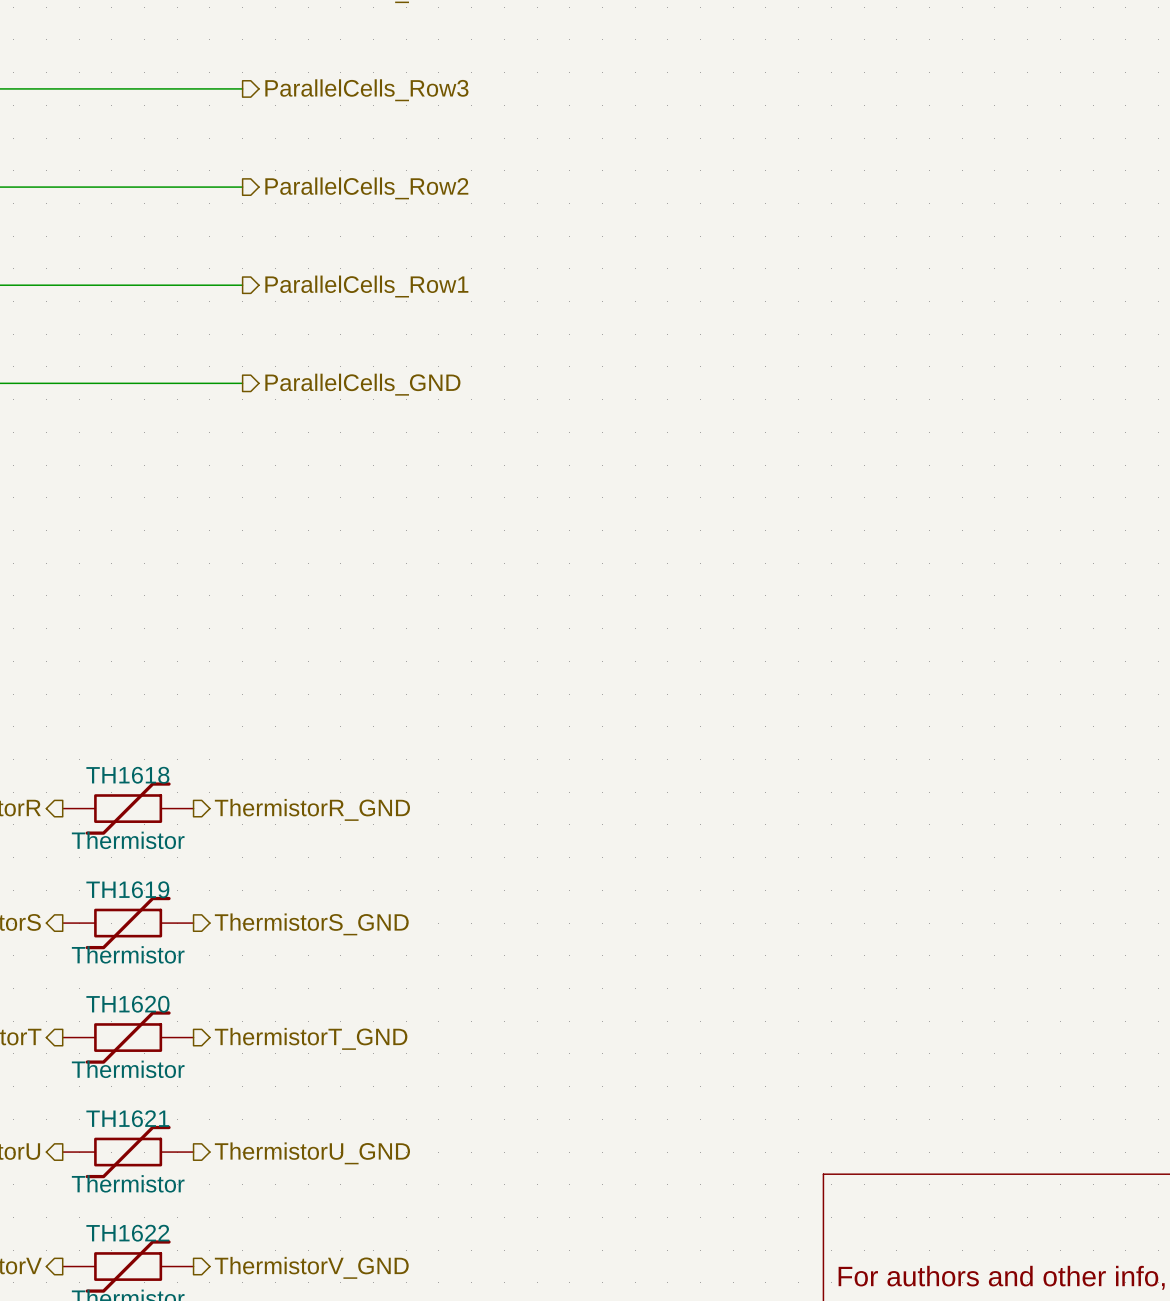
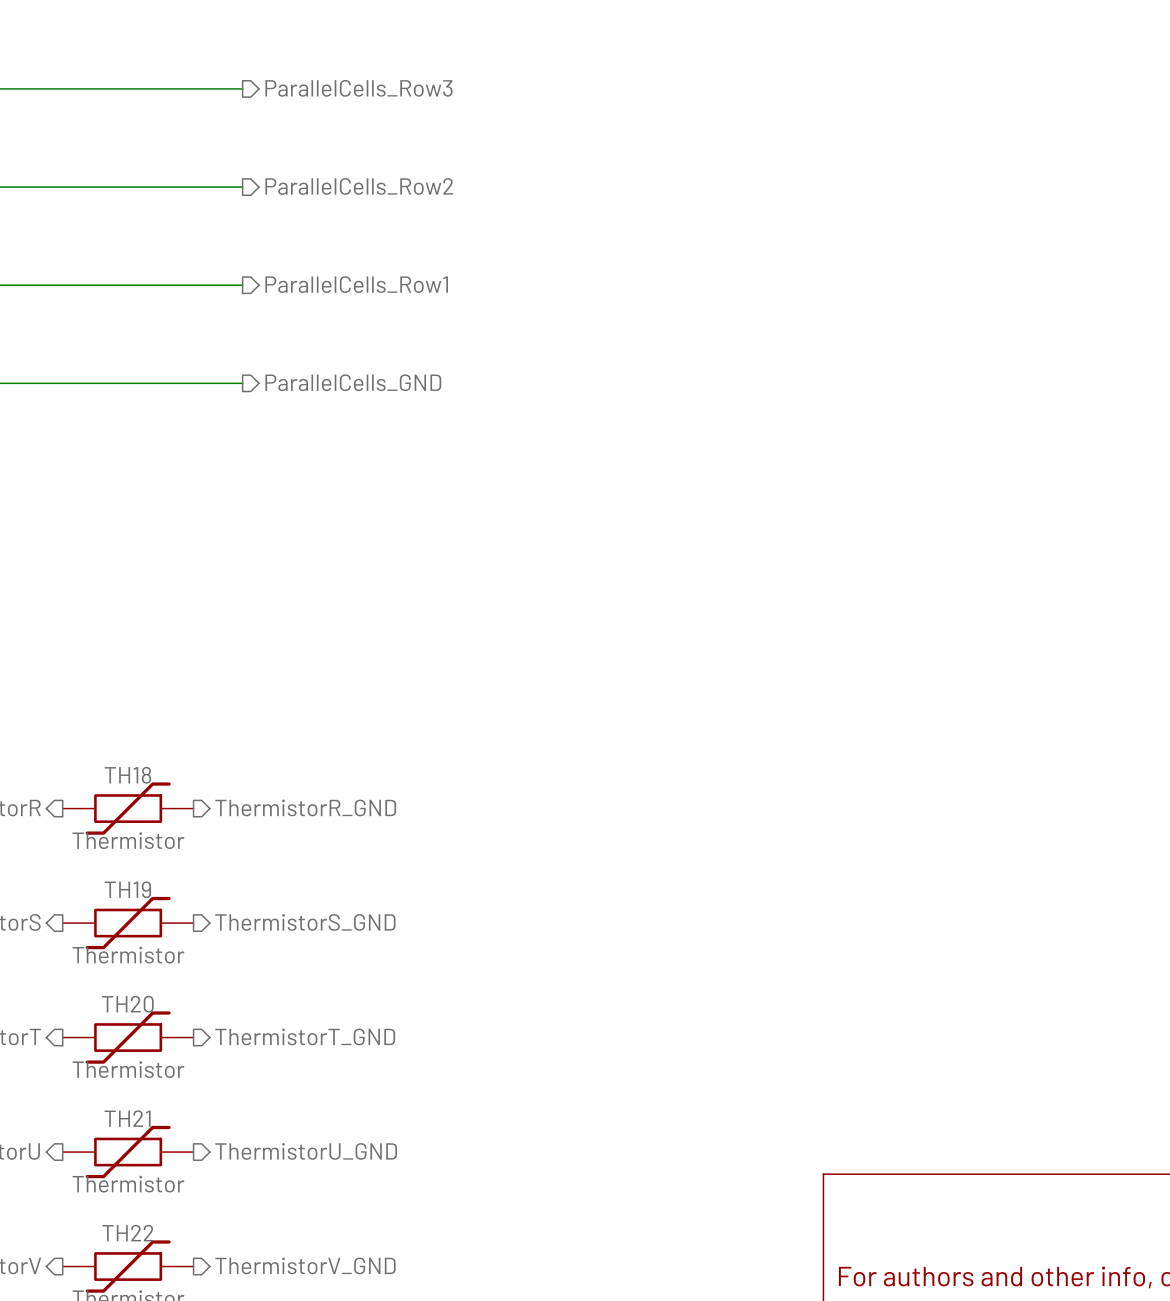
TH1618 name: TH1618 (127, 775) -> TH18 (127, 775)
TH1619 name: TH1619 (127, 889) -> TH19 (127, 889)
TH1620 name: TH1620 (127, 1004) -> TH20 (127, 1004)
TH1621 name: TH1621 (127, 1118) -> TH21 (127, 1118)
TH1622 name: TH1622 (127, 1233) -> TH22 (127, 1233)

